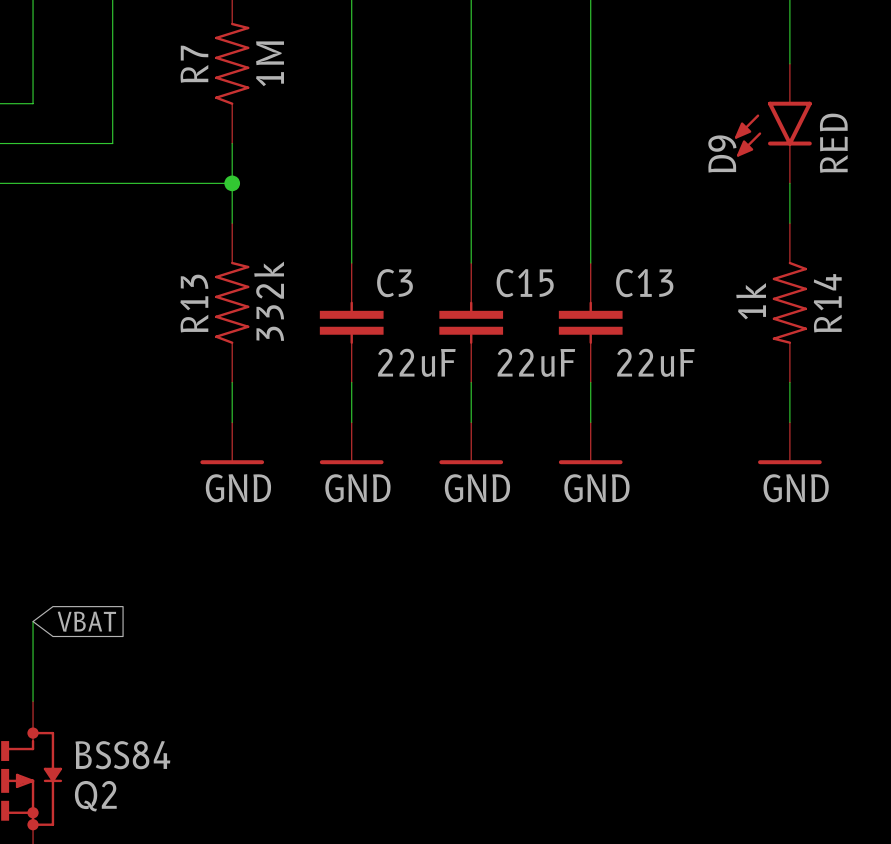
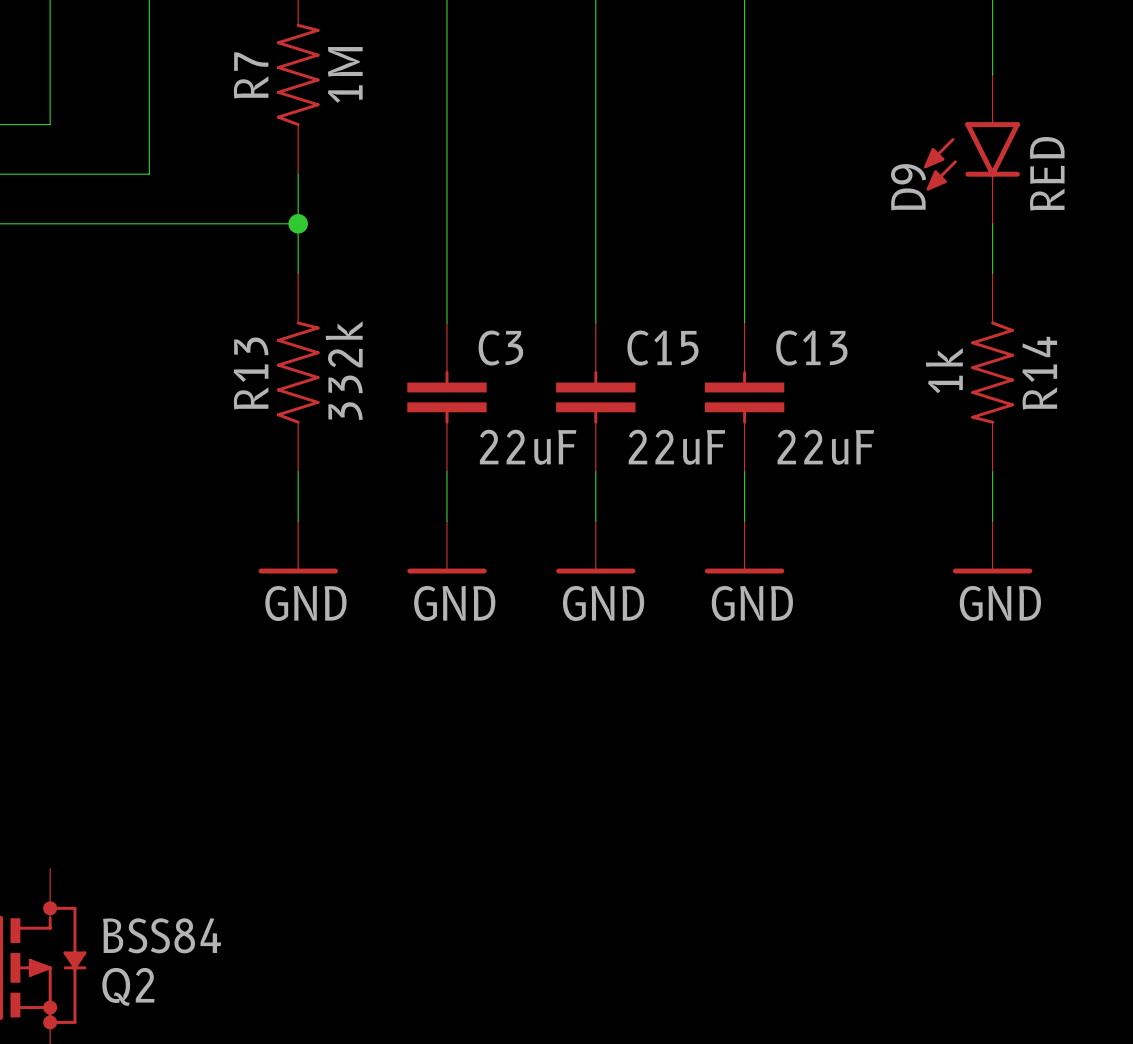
wire: (33, 621) (33, 701) -> none
global label: VBAT (86, 621) -> none

